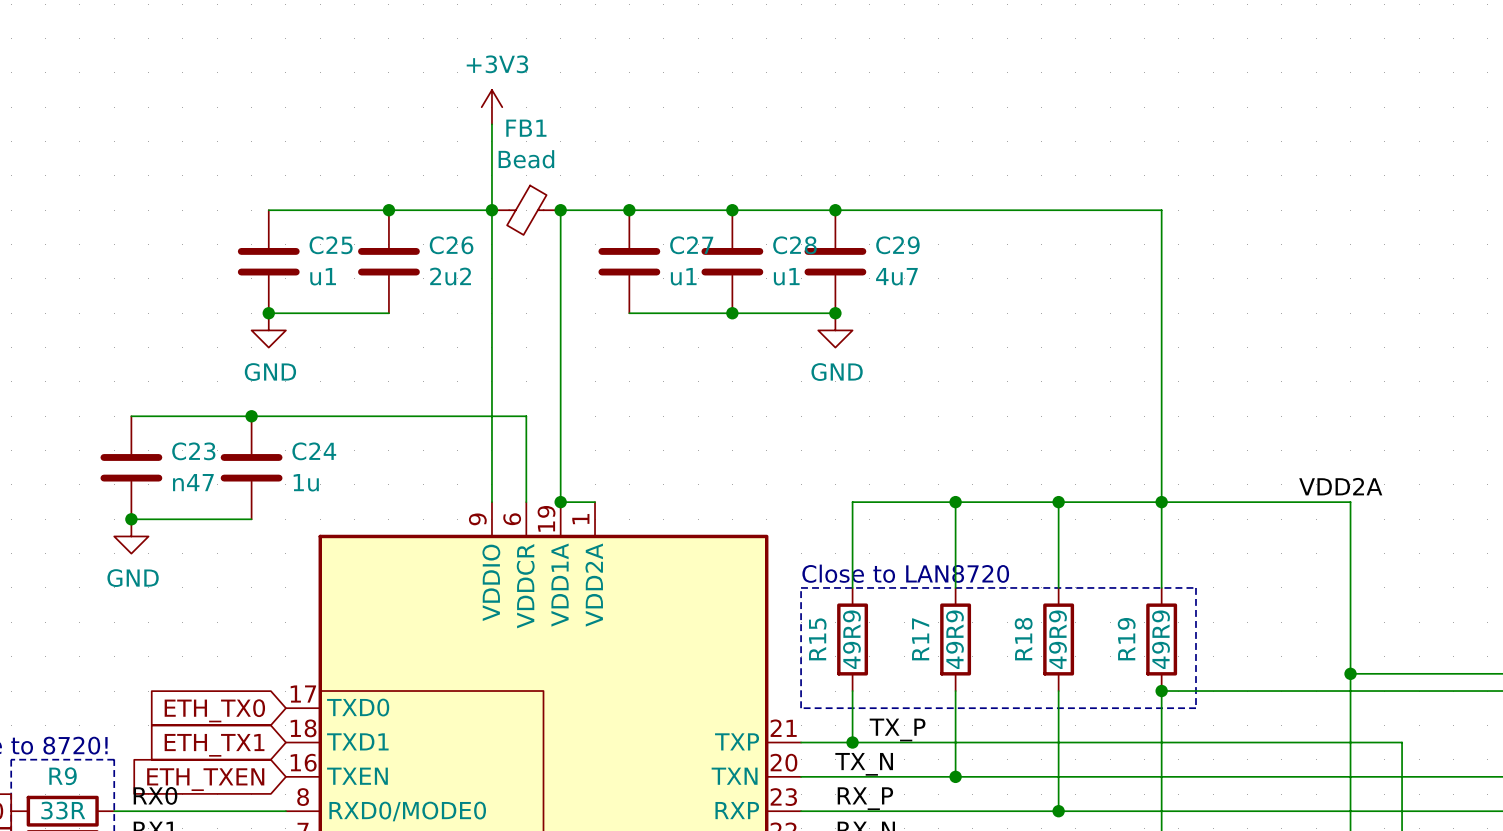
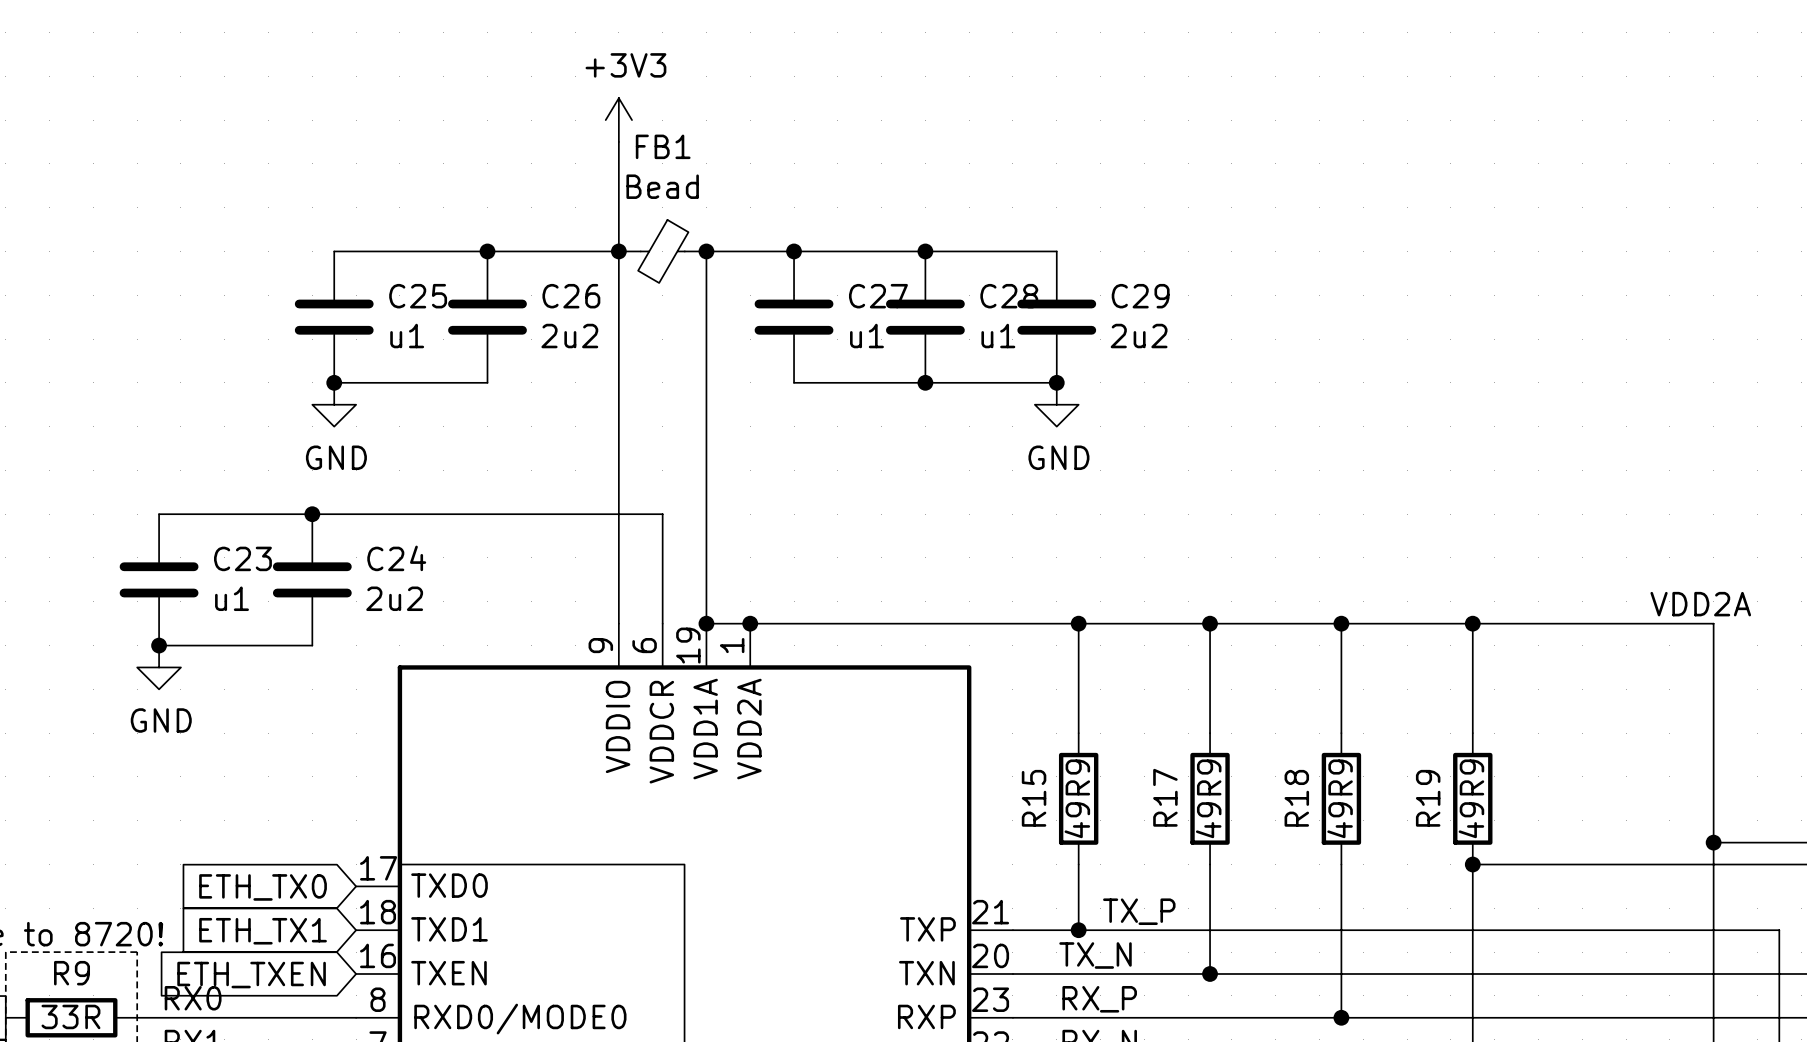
wire: (835, 210) (1161, 210) (1161, 502) -> none
junction: (835, 210) -> none
C29 value: 4u7 (896, 276) -> 2u2 (1139, 336)
C23 value: n47 (193, 482) -> u1 (232, 598)
C24 value: 1u (306, 482) -> 2u2 (394, 598)
wire: none -> (750, 623) (1078, 623)
junction: none -> (750, 623)
junction: none -> (1078, 623)
text: Close to LAN8720 (905, 573) -> none
line: (801, 587) (1195, 587) (1195, 708) (801, 708) (801, 587) -> none

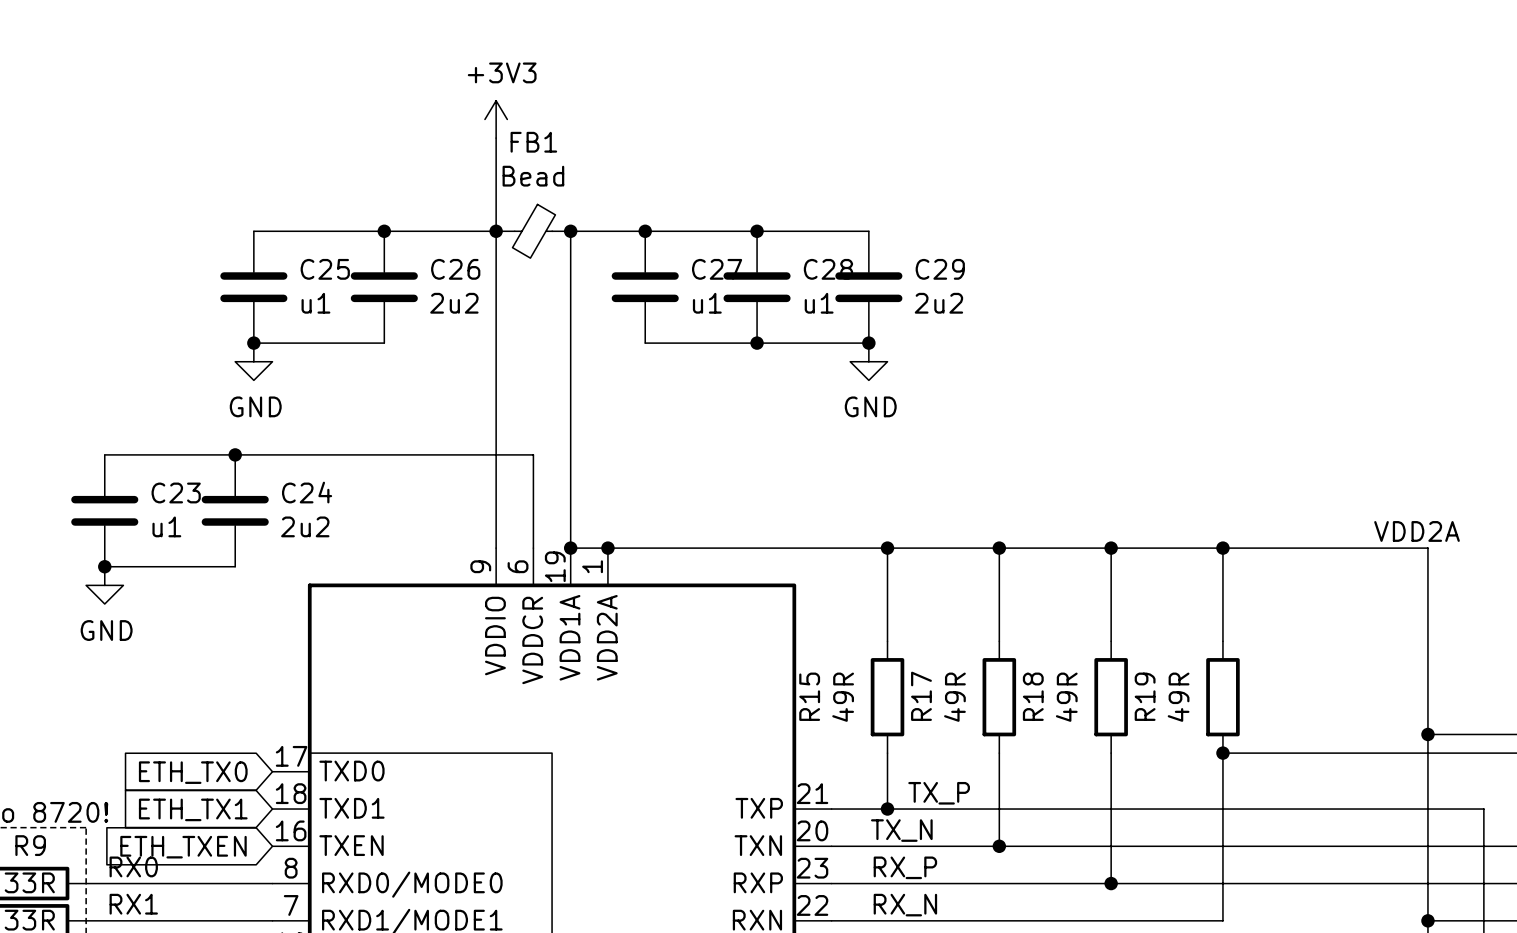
R17 name position: R17 (1165, 797) -> R17 (921, 696)
R15 name position: R15 (1034, 798) -> R15 (809, 696)
R15 value: 49R9 (1077, 798) -> 49R (843, 697)
R17 value: 49R9 (1208, 798) -> 49R (954, 697)
R18 name position: R18 (1296, 798) -> R18 (1033, 696)
R18 value: 49R9 (1340, 798) -> 49R (1066, 697)
R19 name position: R19 (1428, 798) -> R19 (1145, 696)
R19 value: 49R9 (1471, 798) -> 49R (1178, 697)

